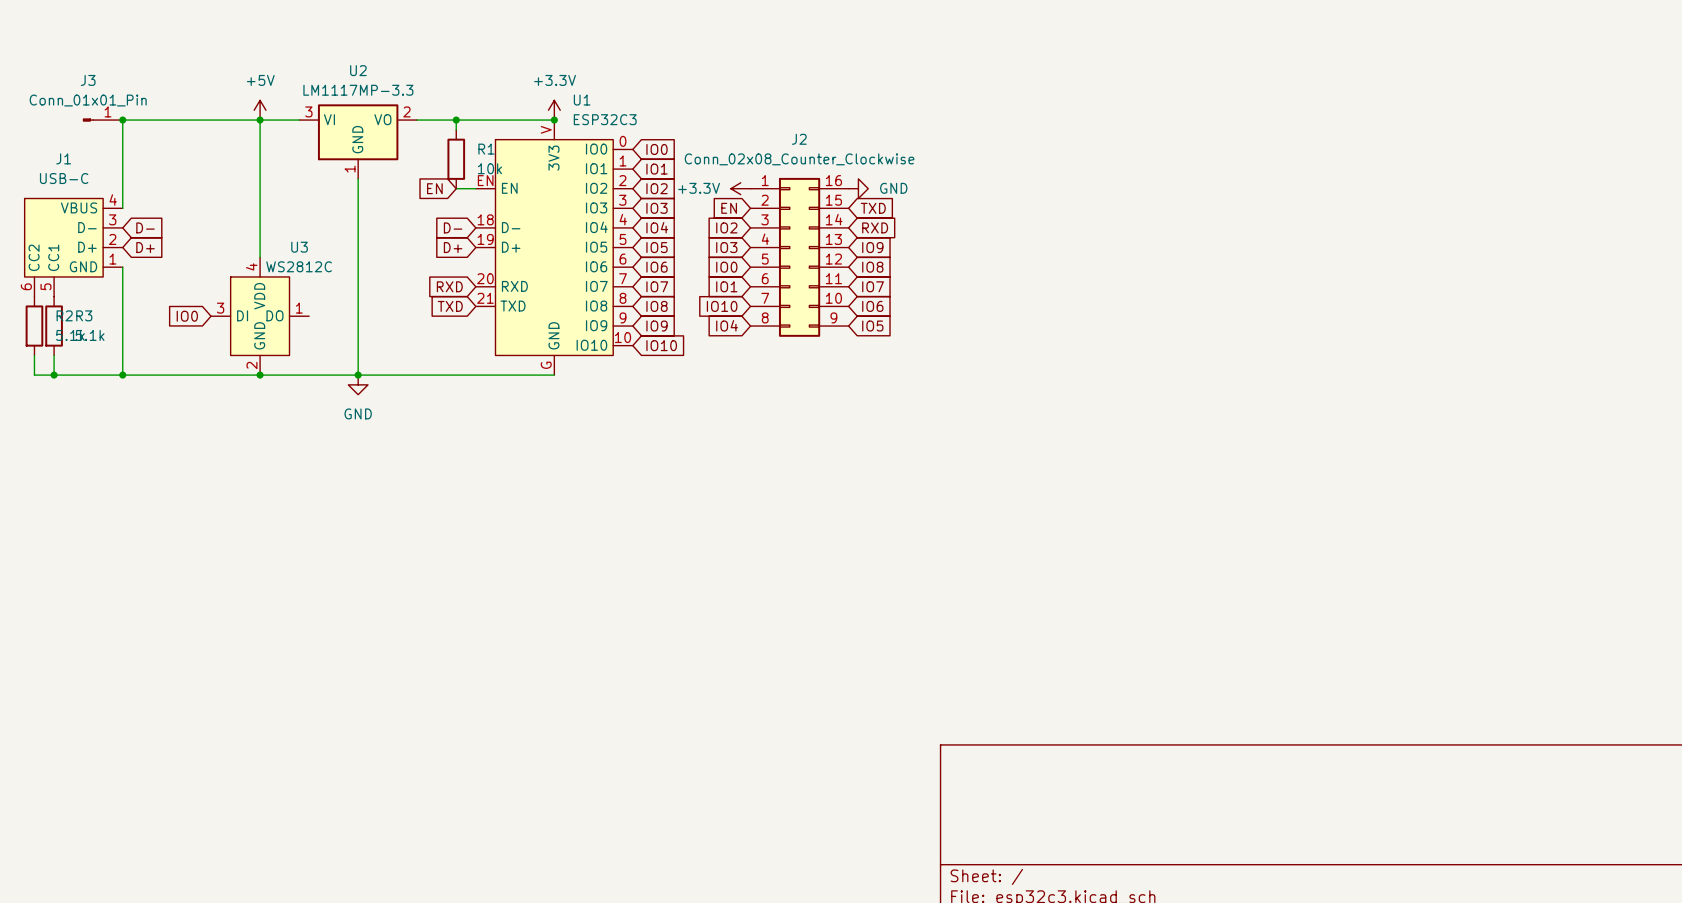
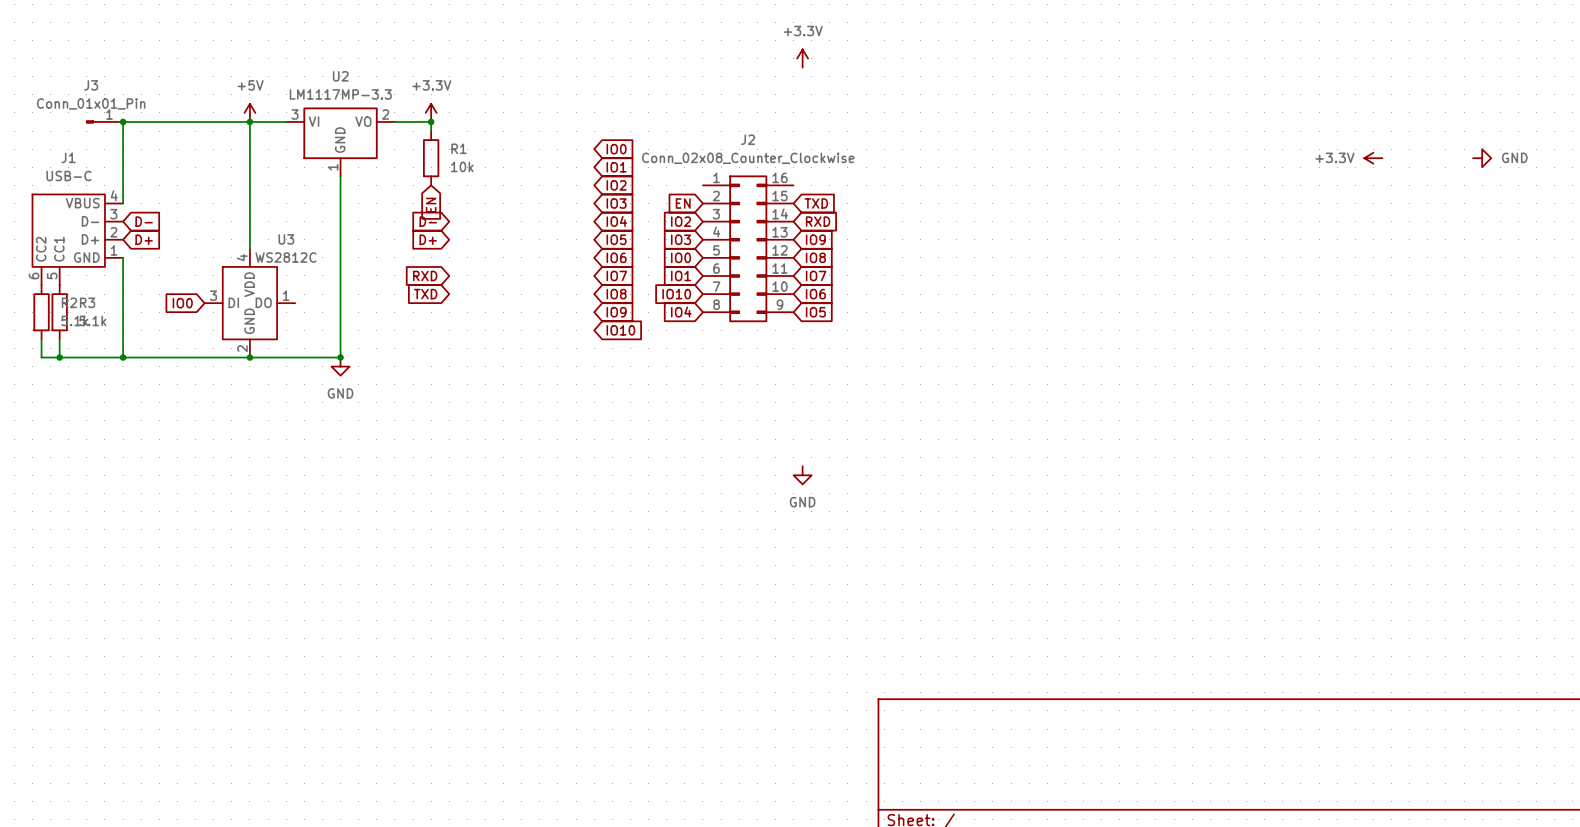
power symbol: none -> +3.3V (802, 58)
power symbol position: +3.3V (554, 110) -> +3.3V (431, 112)
wire: (456, 120) (554, 120) -> none
junction: (554, 120) -> none
power symbol: none -> +3.3V (1373, 158)
power symbol: none -> GND (1482, 158)
global label rotation: 0° (434, 188) -> 90° counterclockwise (431, 205)
wire: (456, 188) (475, 188) -> none
power symbol: +3.3V (740, 188) -> none
power symbol: GND (858, 188) -> none
U1: ESP32C3 (554, 247) -> none
wire: (358, 375) (554, 375) -> none
power symbol: none -> GND (802, 475)

